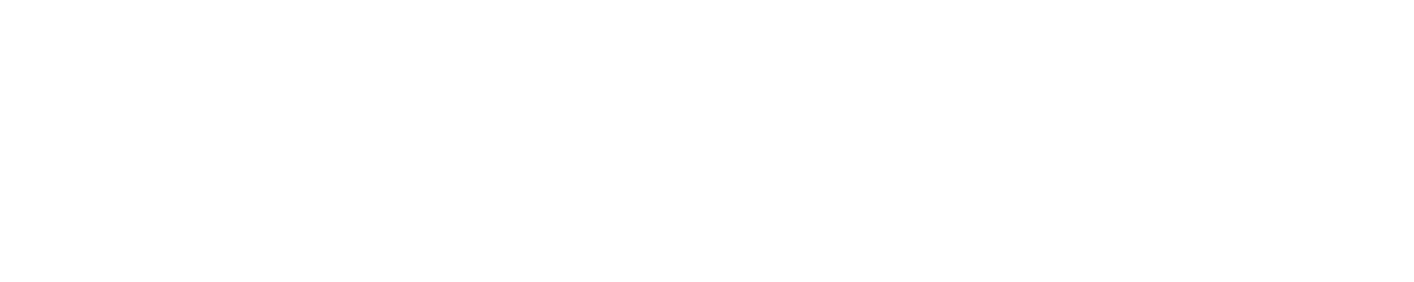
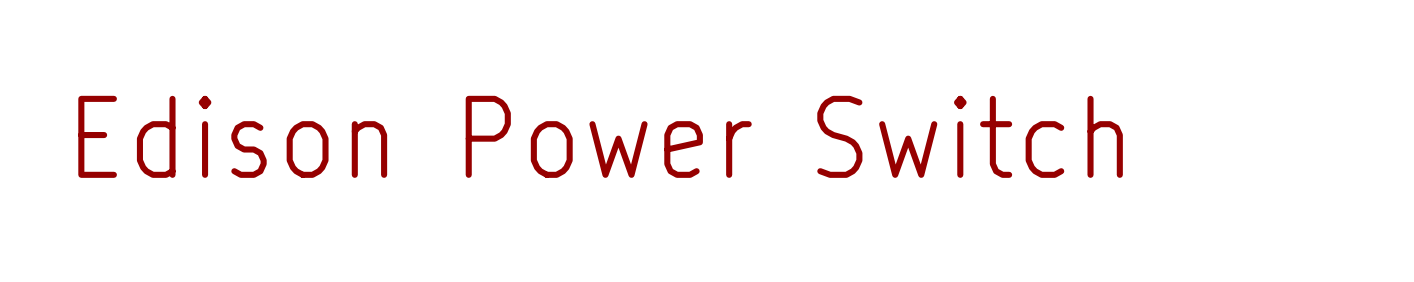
text: none -> Edison Power Switch (600, 136)

